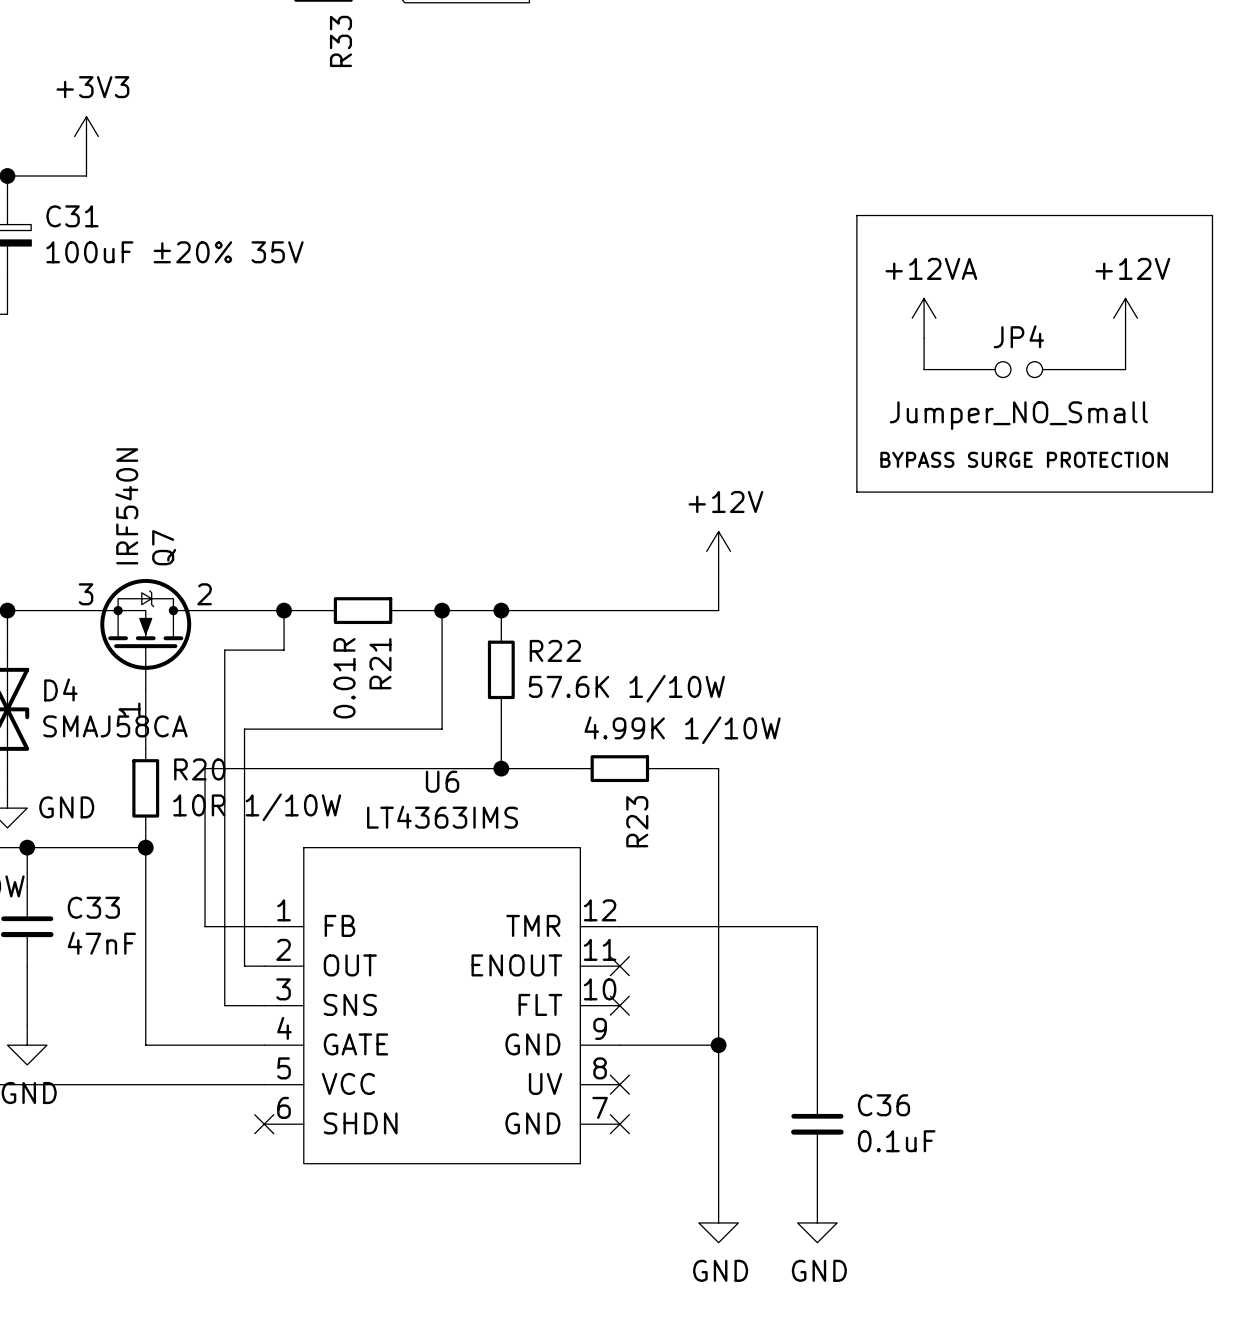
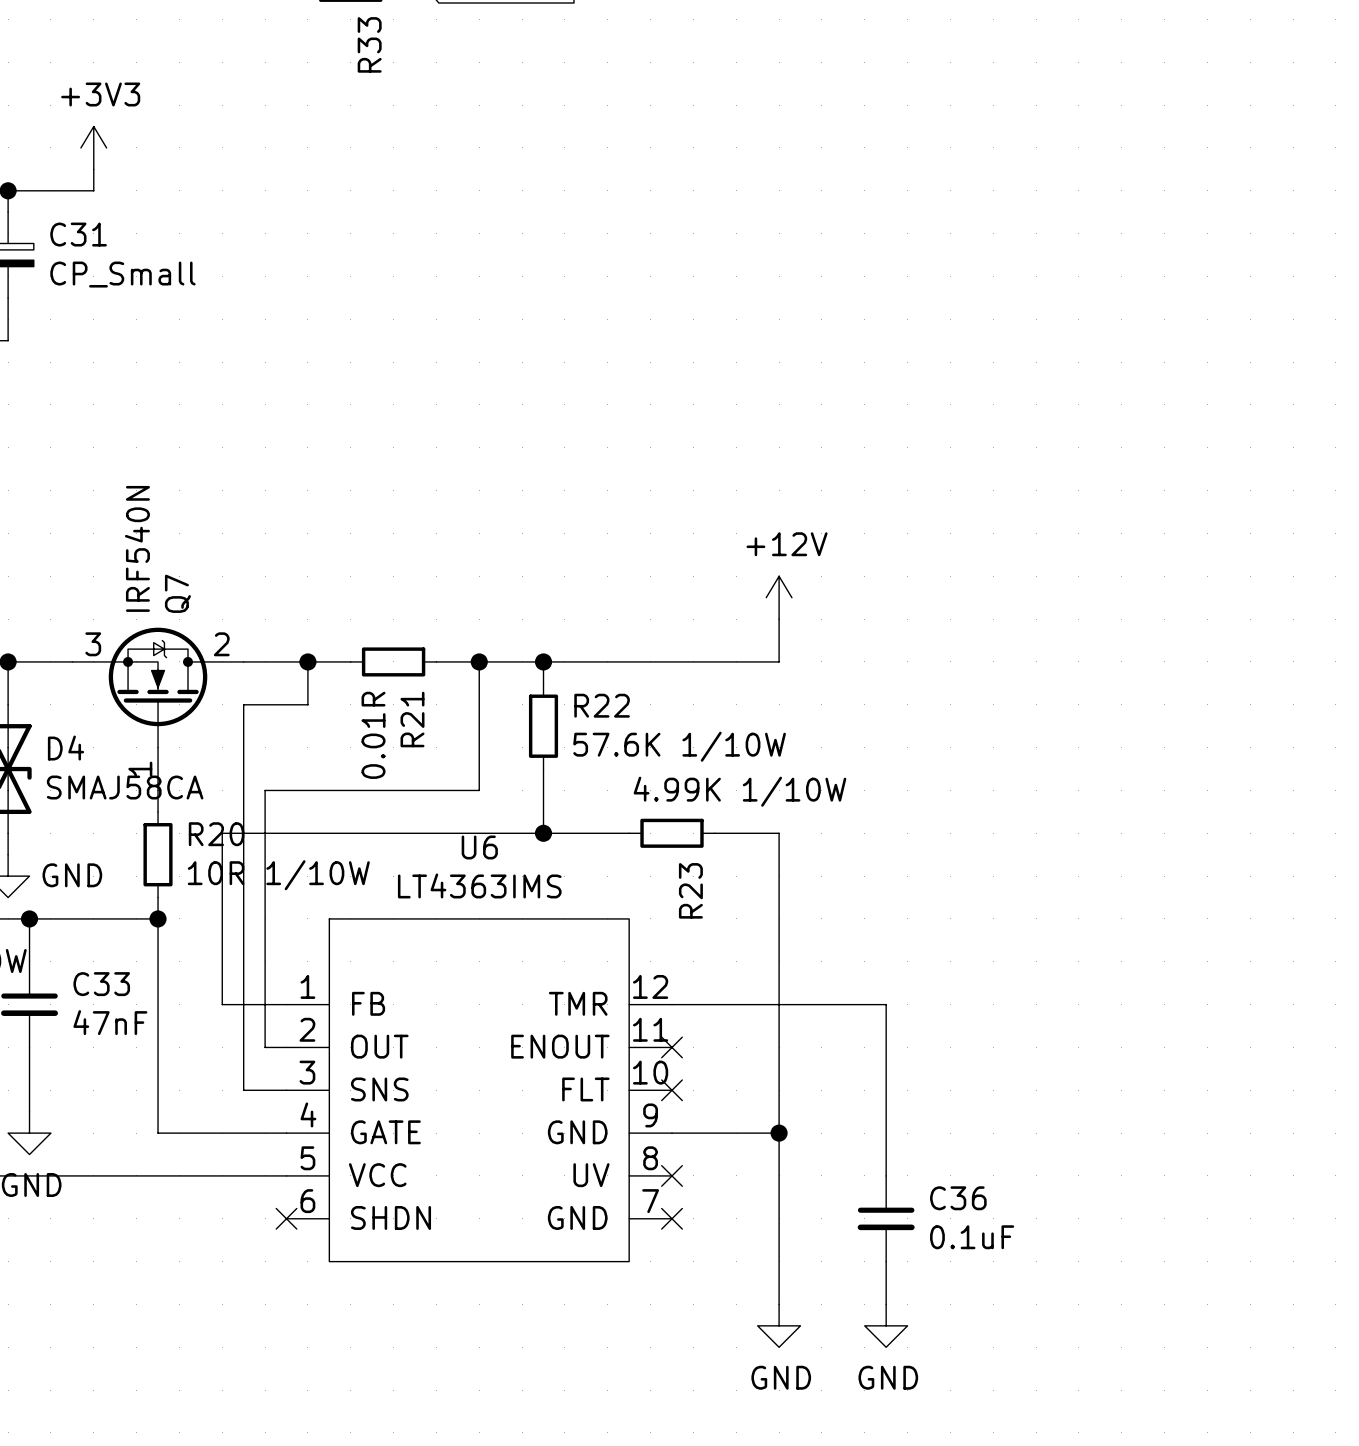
line: (856, 215) (856, 492) (1212, 492) (1212, 215) (856, 215) -> none
C31 value: 100uF ±20% 35V (175, 252) -> CP_Small (122, 274)
power symbol: +12VA (924, 318) -> none
power symbol: +12V (1125, 318) -> none
wire: (924, 337) (924, 369) (979, 369) -> none
wire: (1125, 337) (1125, 369) (1058, 369) -> none
JP4: Jumper_NO_Small (1018, 369) -> none
text: BYPASS SURGE PROTECTION (1024, 459) -> none

